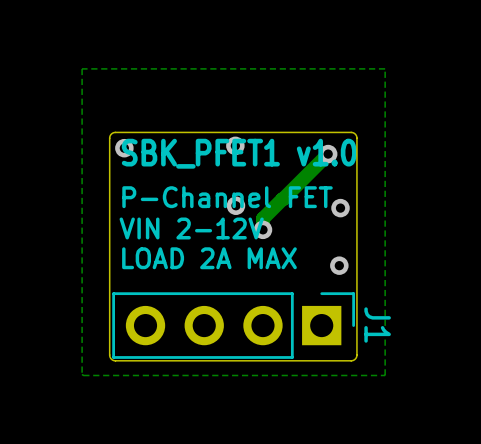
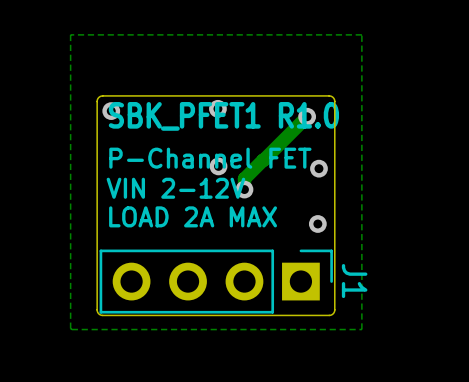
text: SBK_PFET1 v1.0 (239, 153) -> SBK_PFET1 R1.0 (223, 116)

